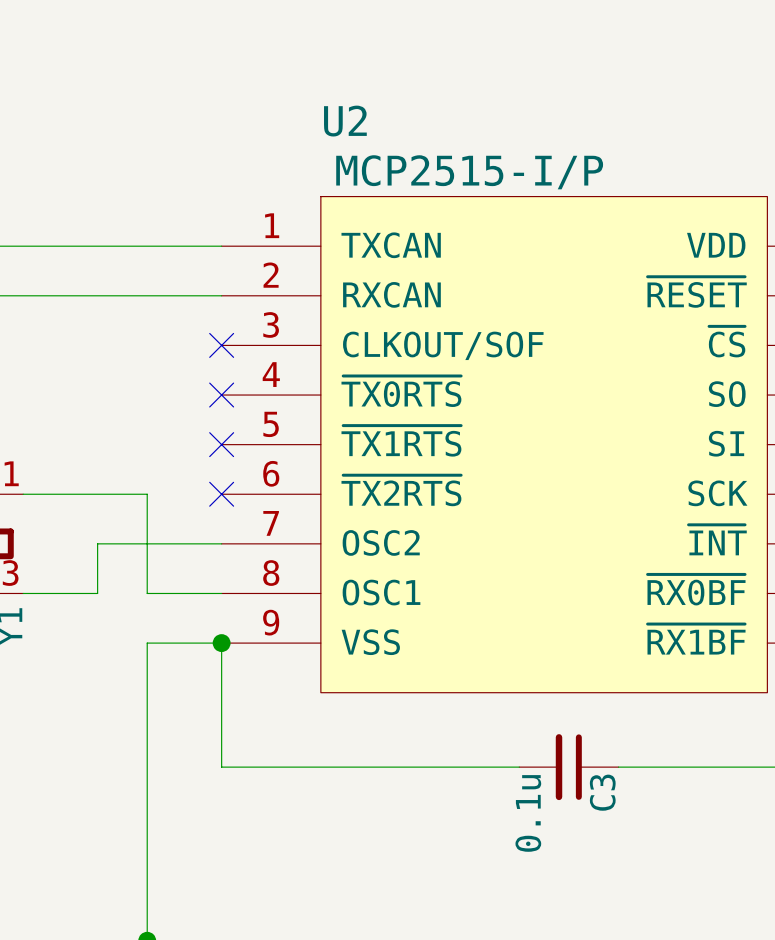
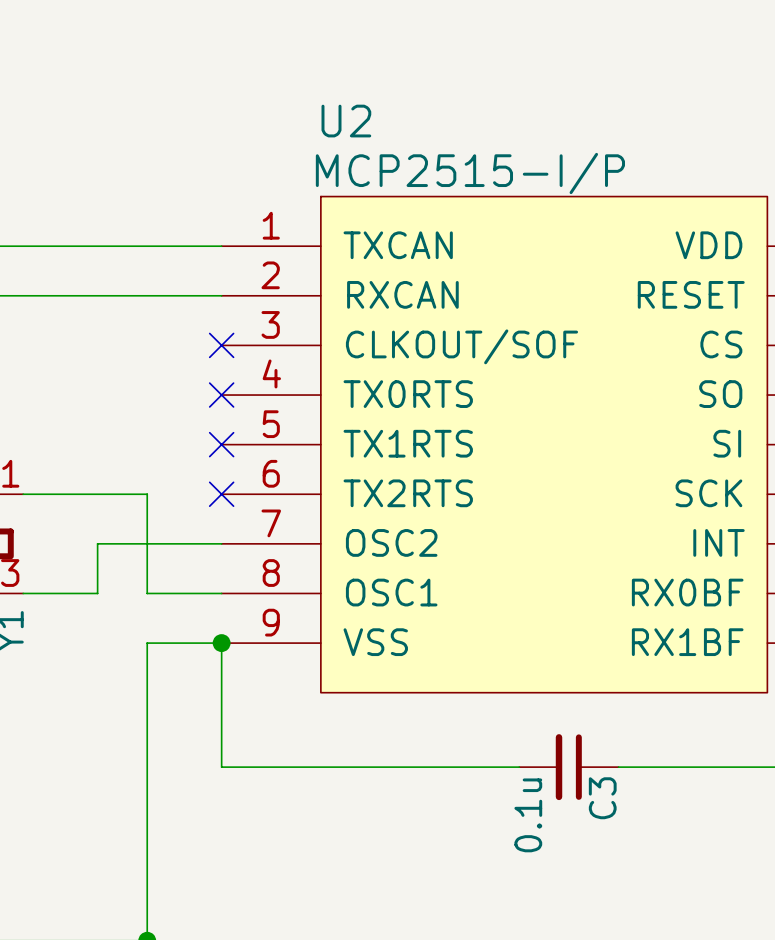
U2 pin name: ~{RESET} (697, 292) -> RESET (691, 294)
U2 pin name: ~{CS} (727, 341) -> CS (721, 344)
U2 pin name: ~{TX0RTS} (401, 391) -> TX0RTS (408, 394)
U2 pin name: ~{TX1RTS} (401, 441) -> TX1RTS (408, 443)
U2 pin name: ~{TX2RTS} (401, 490) -> TX2RTS (408, 493)
U2 pin name: ~{INT} (717, 540) -> INT (719, 542)
U2 pin name: ~{RX0BF} (696, 589) -> RX0BF (687, 592)
U2 pin name: ~{RX1BF} (696, 639) -> RX1BF (687, 642)

